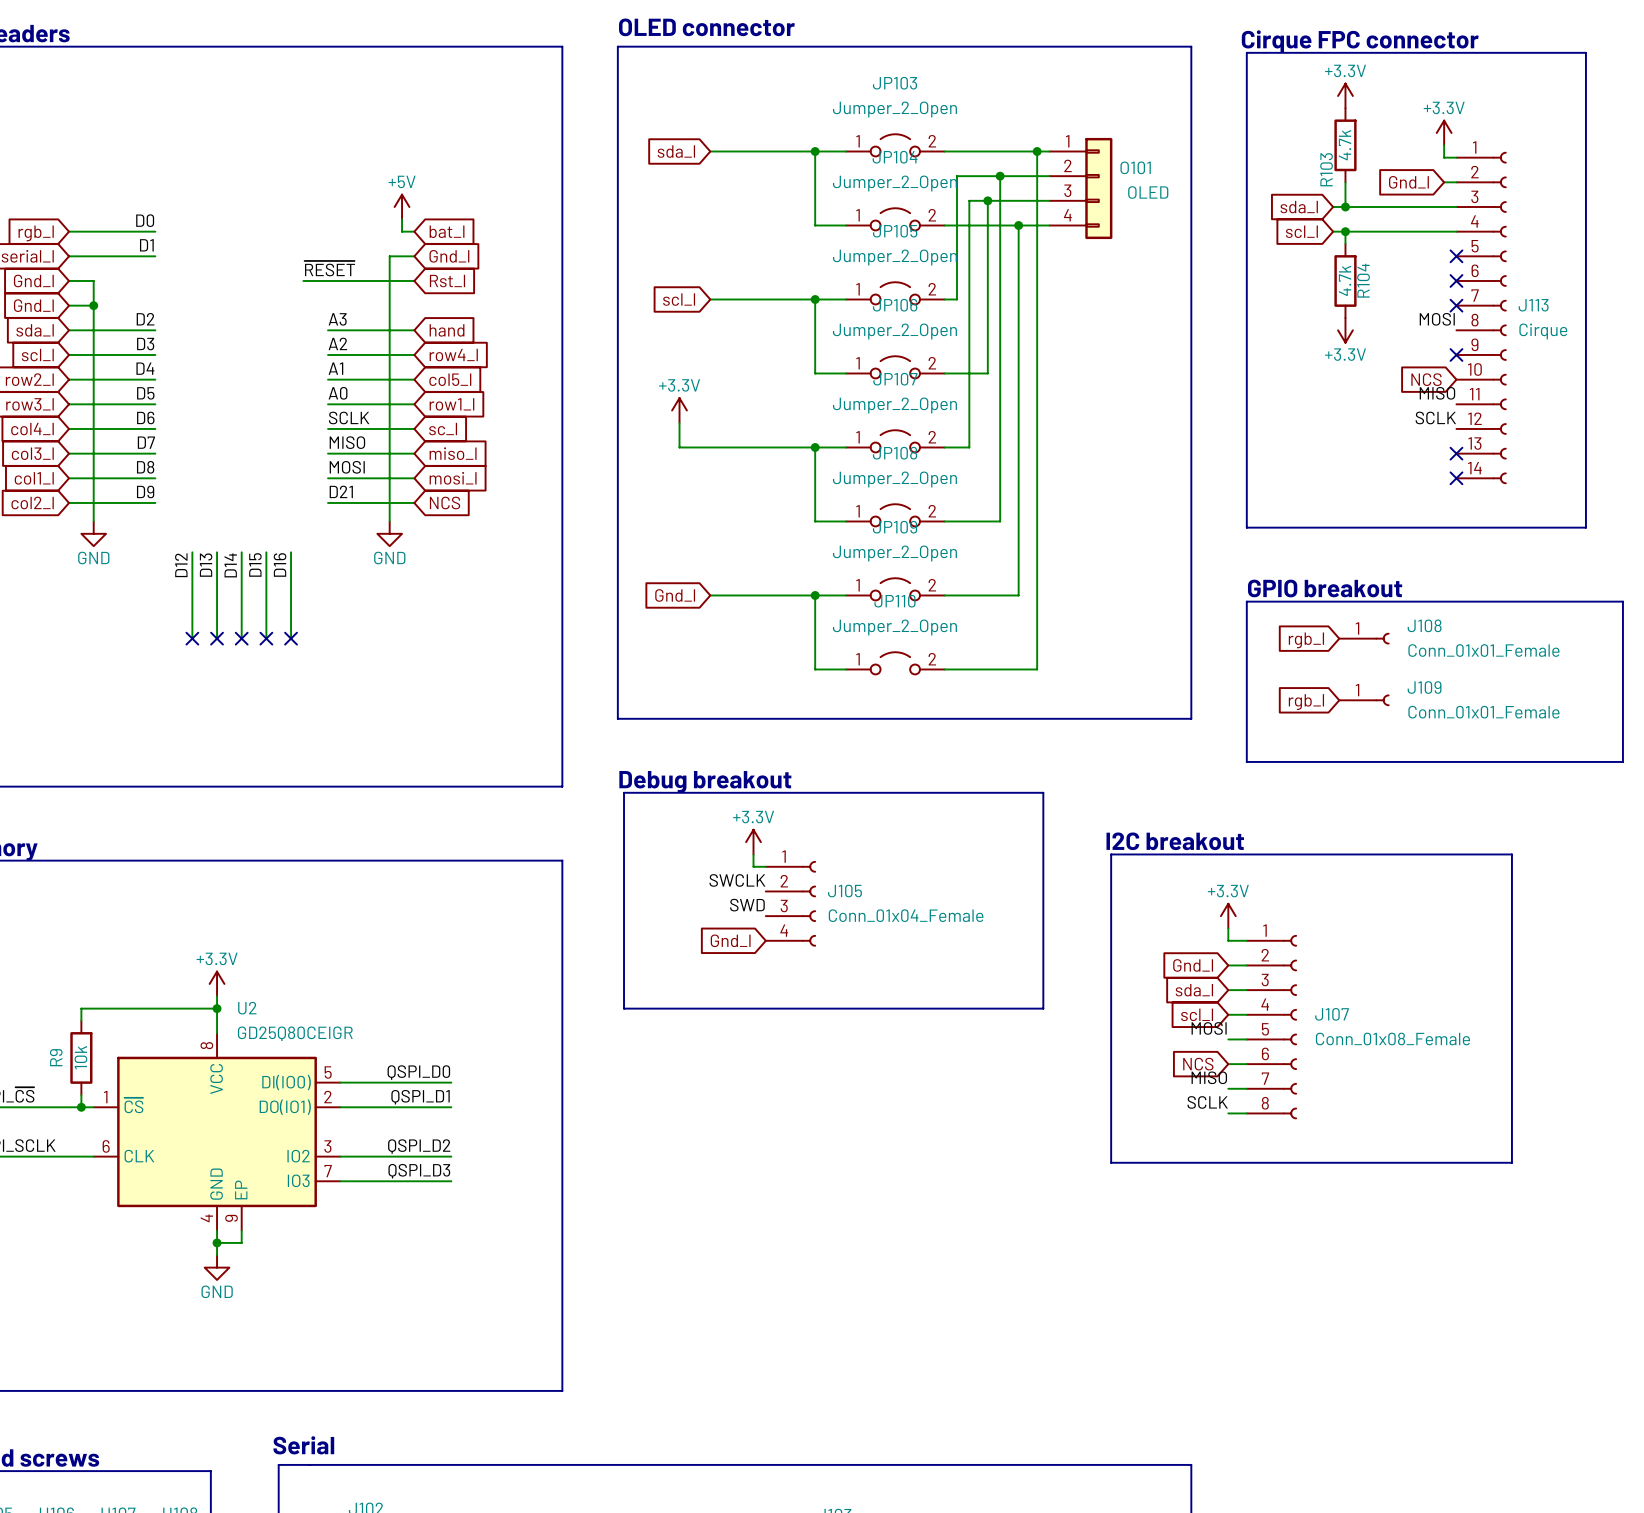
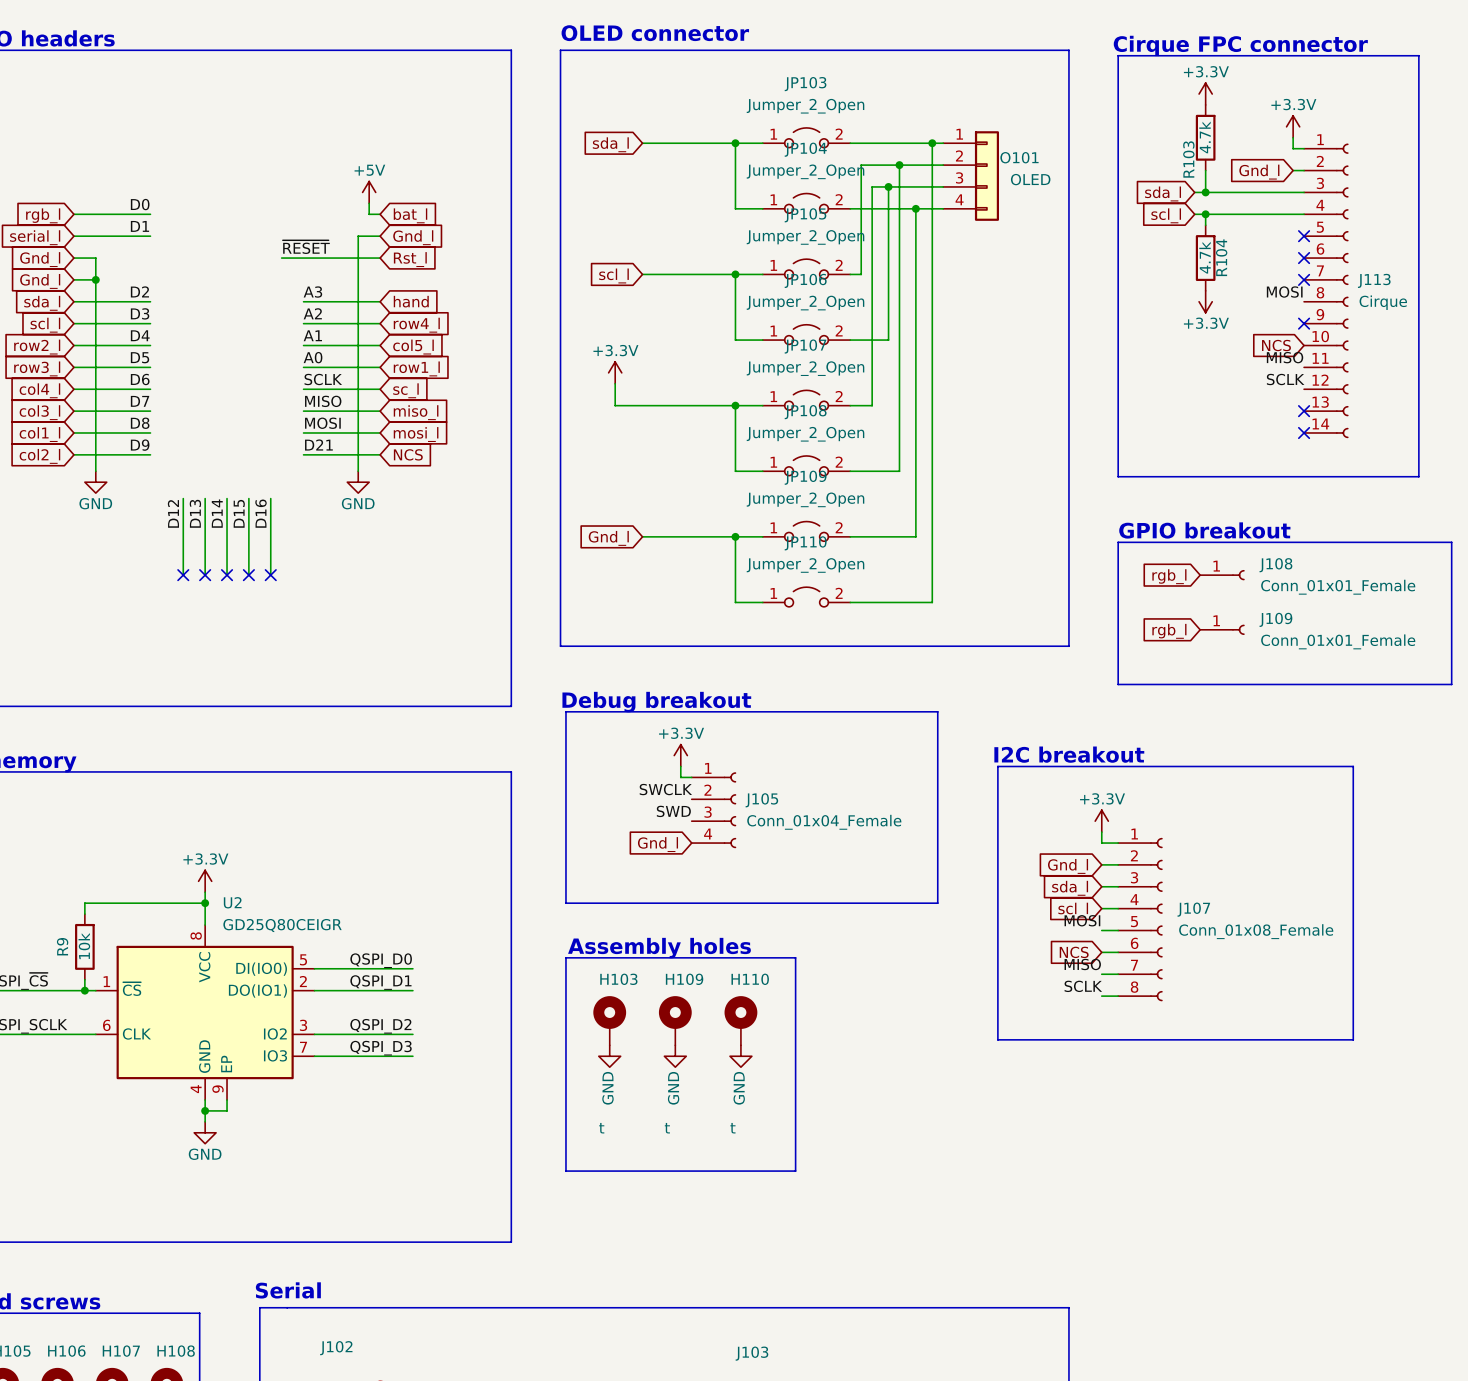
text: none -> Assembly holes (659, 948)
line: none -> (565, 957) (565, 1171) (795, 1171) (795, 957) (565, 957)
H103: none -> t (609, 1020)
H109: none -> t (675, 1020)
H110: none -> t (740, 1020)
power symbol: none -> GND (609, 1056)
power symbol: none -> GND (675, 1056)
power symbol: none -> GND (740, 1056)

